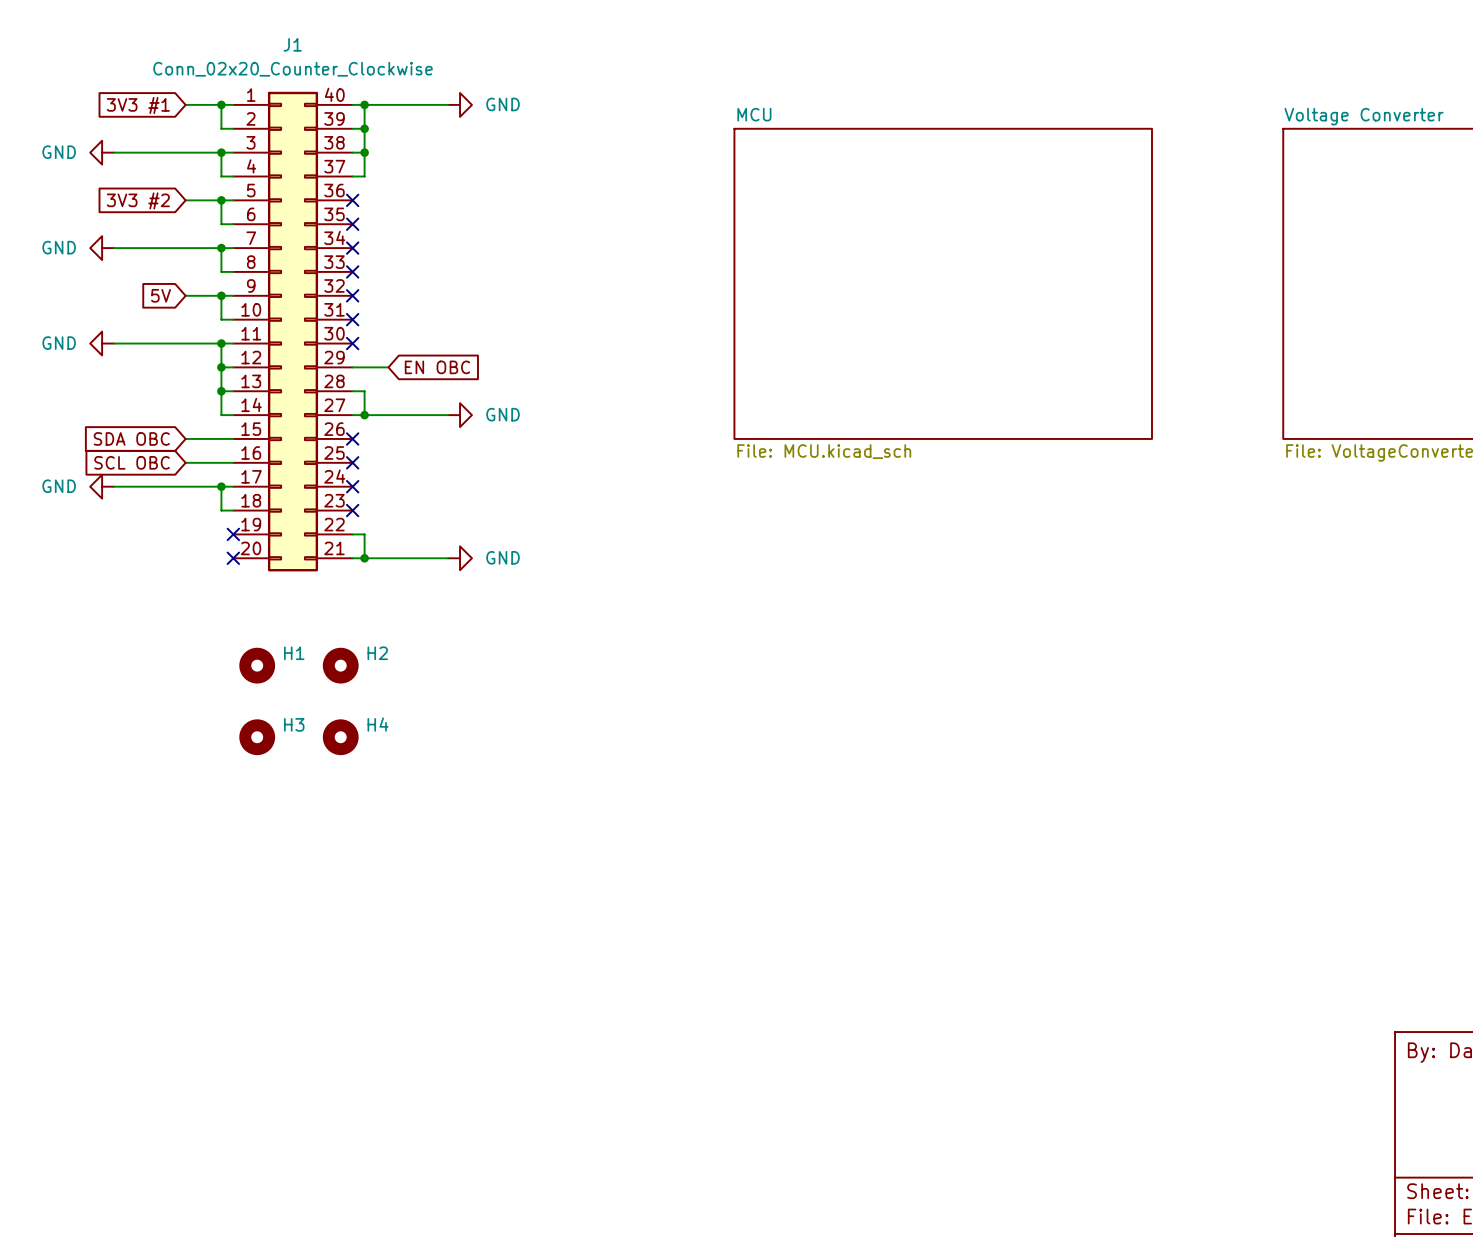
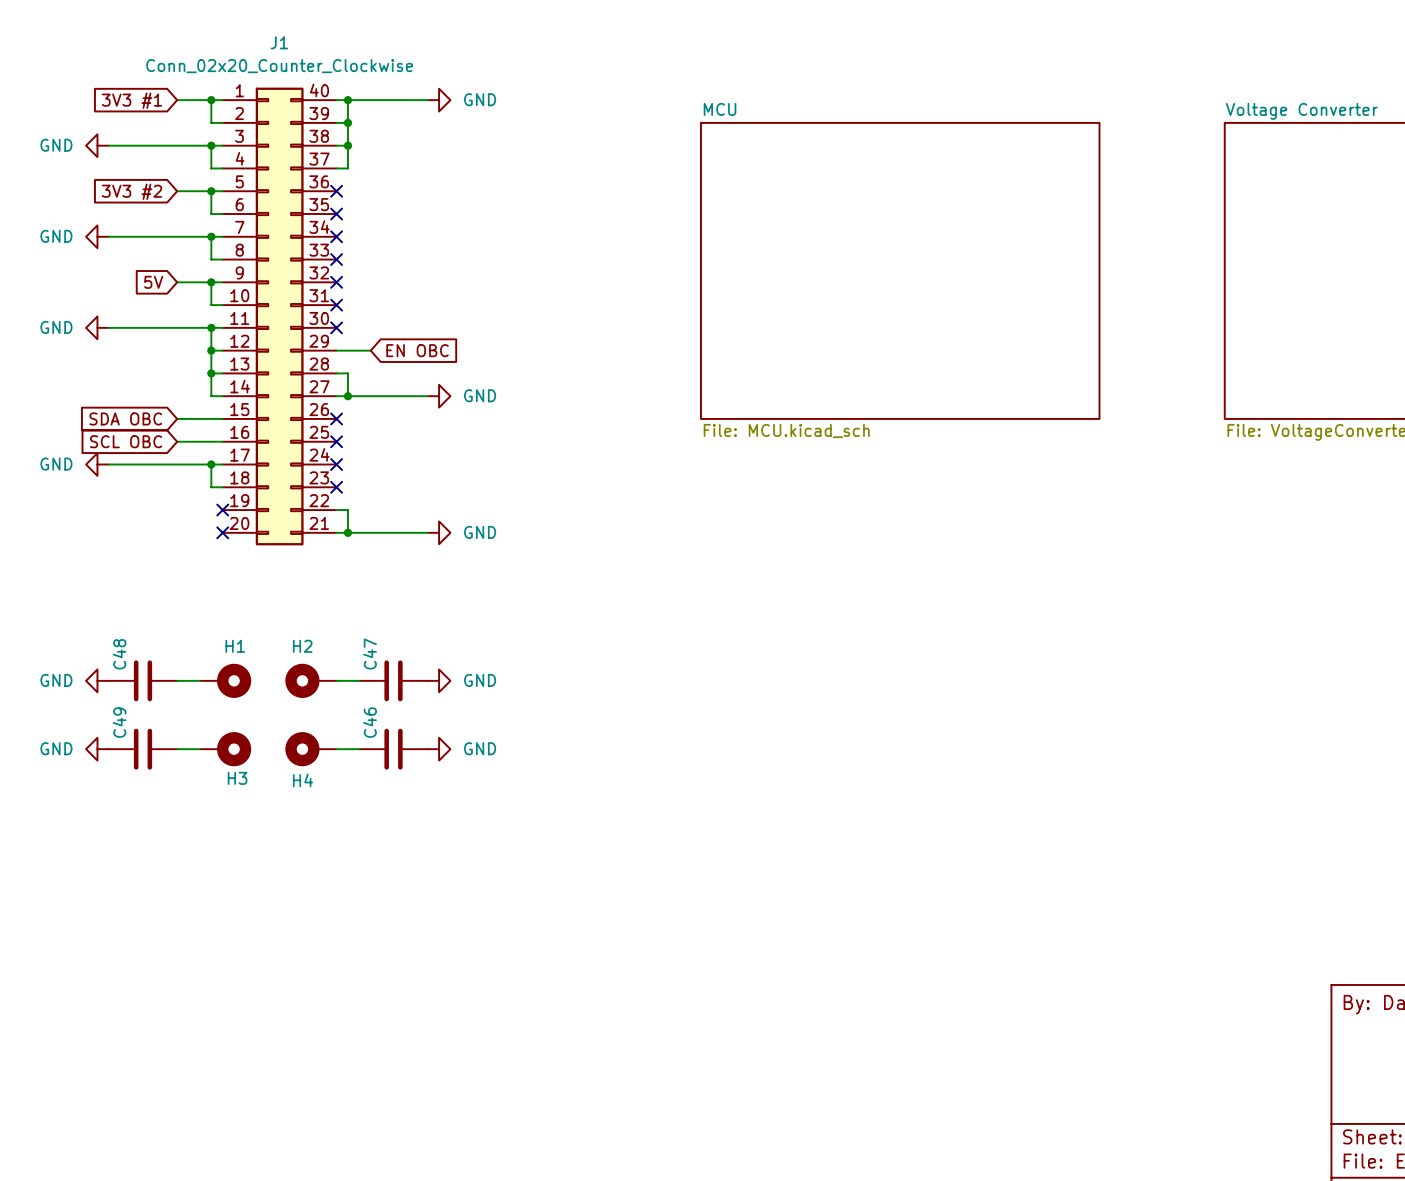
H1 symbol: [239, 647, 276, 684] -> [199, 663, 252, 698]
H2 symbol: [322, 647, 359, 684] -> [285, 663, 337, 698]
H1 name position: H1 (294, 653) -> H1 (235, 646)
H2 name position: H2 (377, 653) -> H2 (302, 646)
power symbol: none -> GND (97, 680)
C48: none -> (143, 680)
wire: none -> (177, 680) (199, 680)
wire: none -> (336, 680) (359, 680)
C47: none -> (393, 680)
power symbol: none -> GND (439, 680)
H3 symbol: [239, 719, 276, 756] -> [199, 732, 252, 767]
H4 symbol: [322, 719, 359, 756] -> [285, 732, 337, 767]
H3 name position: H3 (294, 724) -> H3 (237, 778)
H4 name position: H4 (378, 724) -> H4 (302, 780)
power symbol: none -> GND (97, 749)
C49: none -> (143, 749)
wire: none -> (177, 749) (199, 749)
wire: none -> (336, 749) (359, 749)
C46: none -> (393, 749)
power symbol: none -> GND (439, 749)

